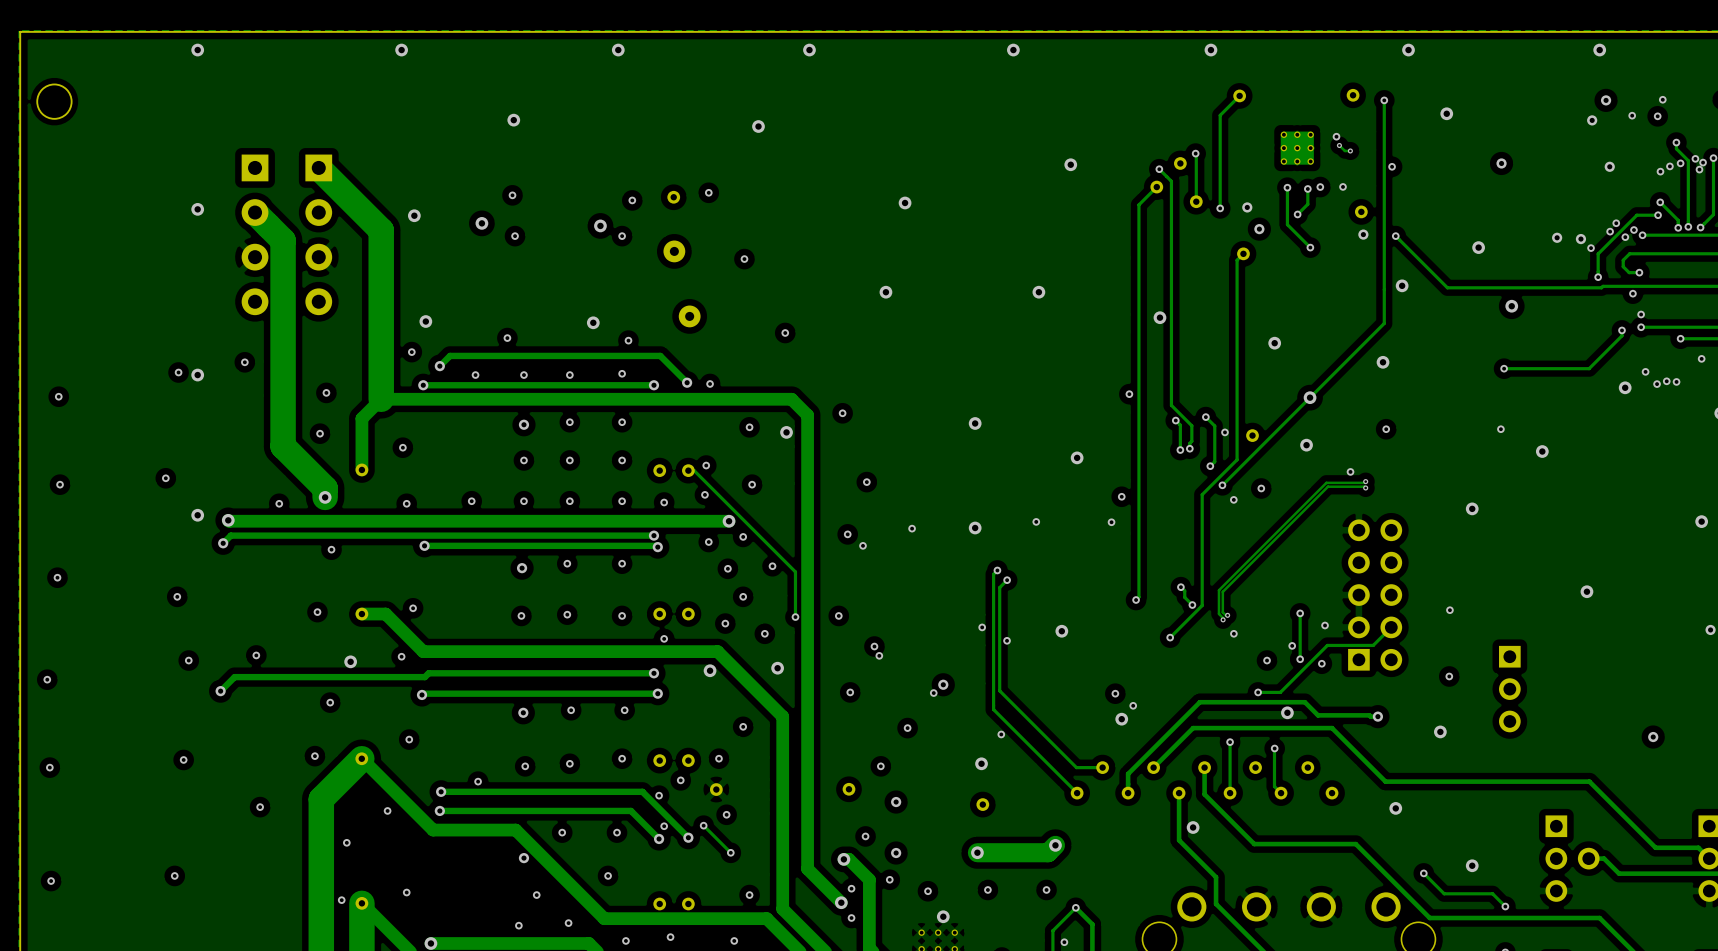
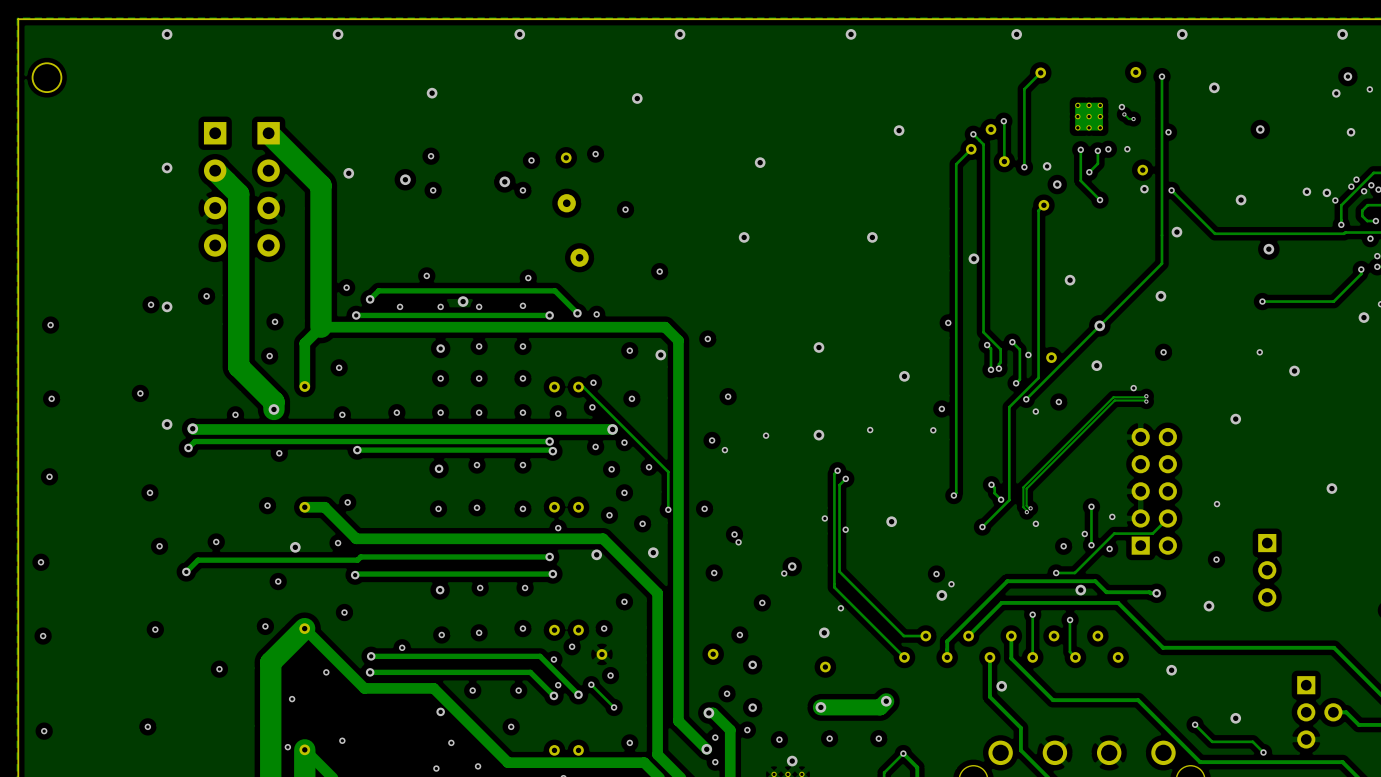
via: (425, 321) -> none
via position: (593, 322) -> (463, 301)

